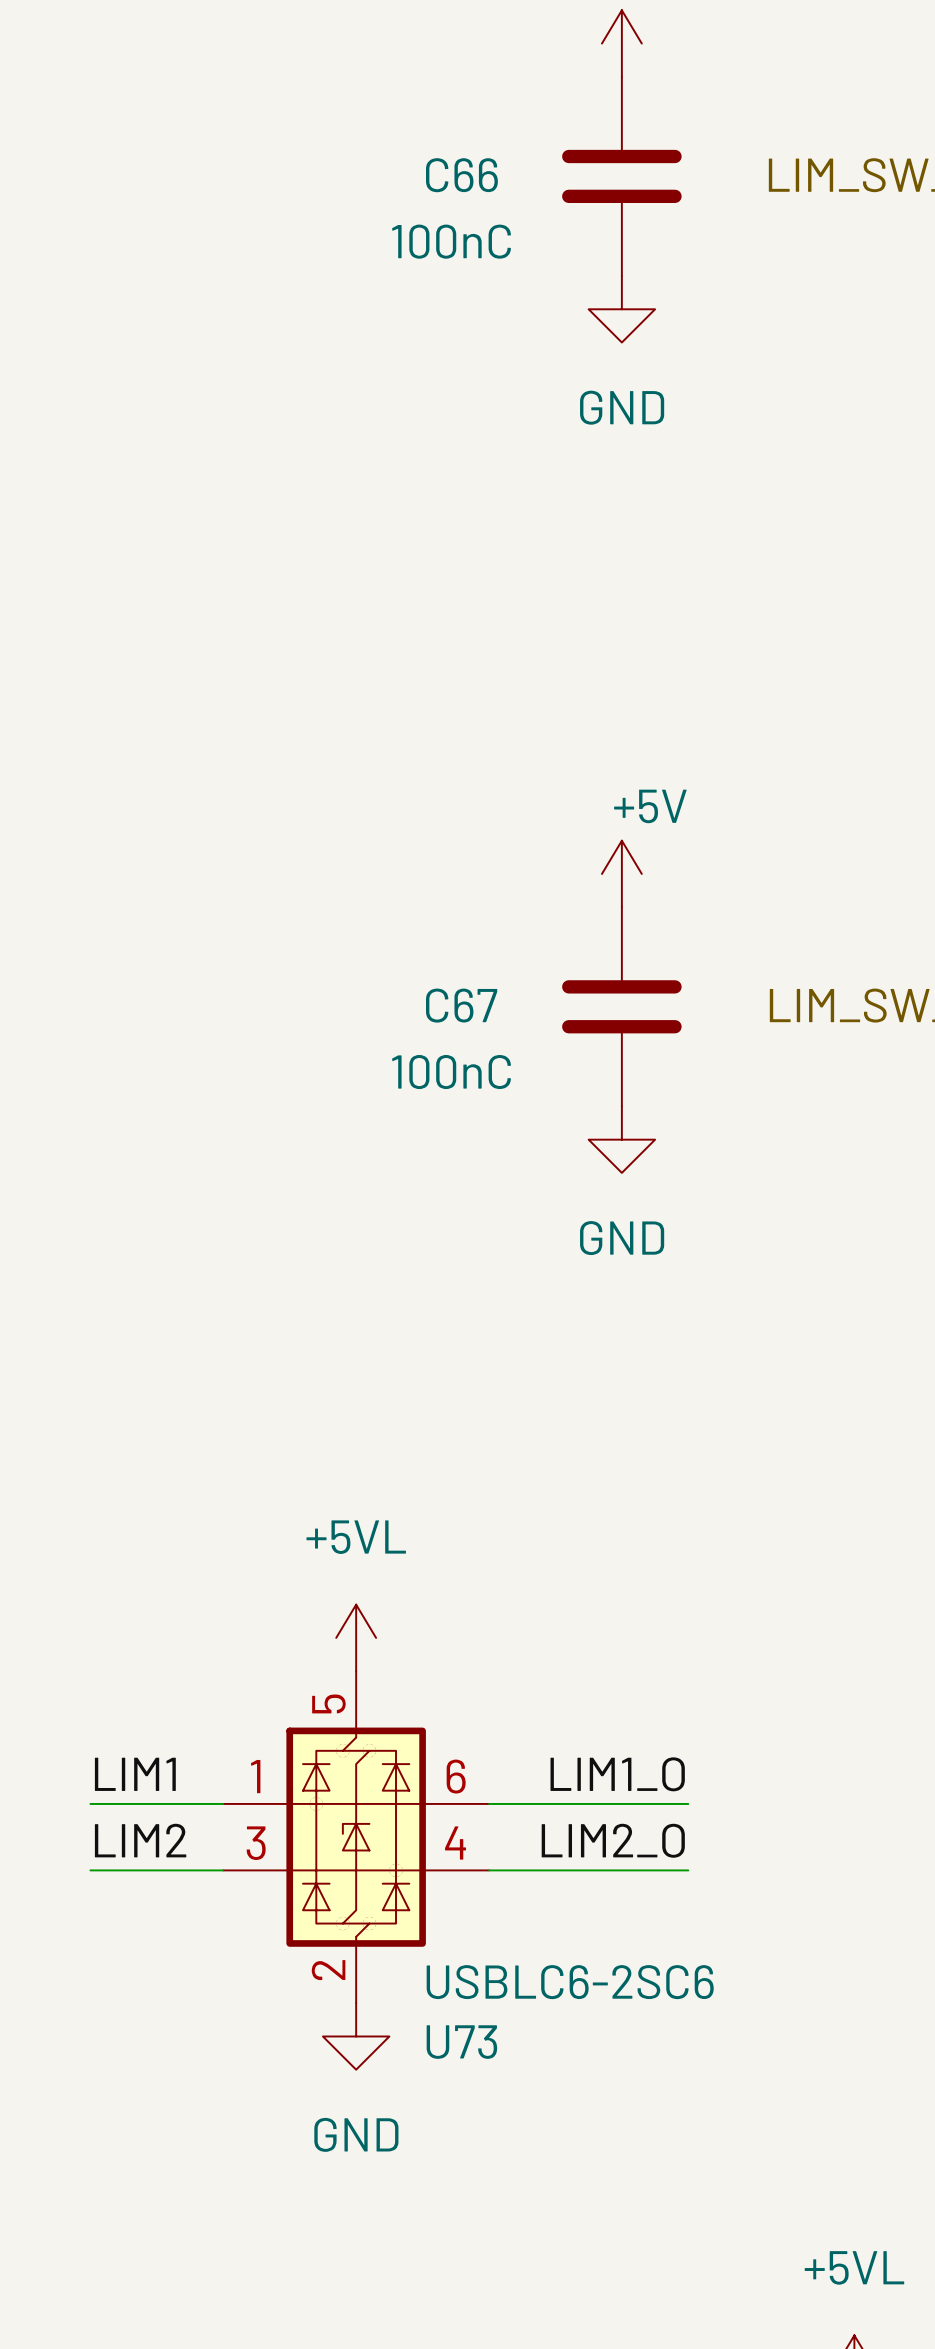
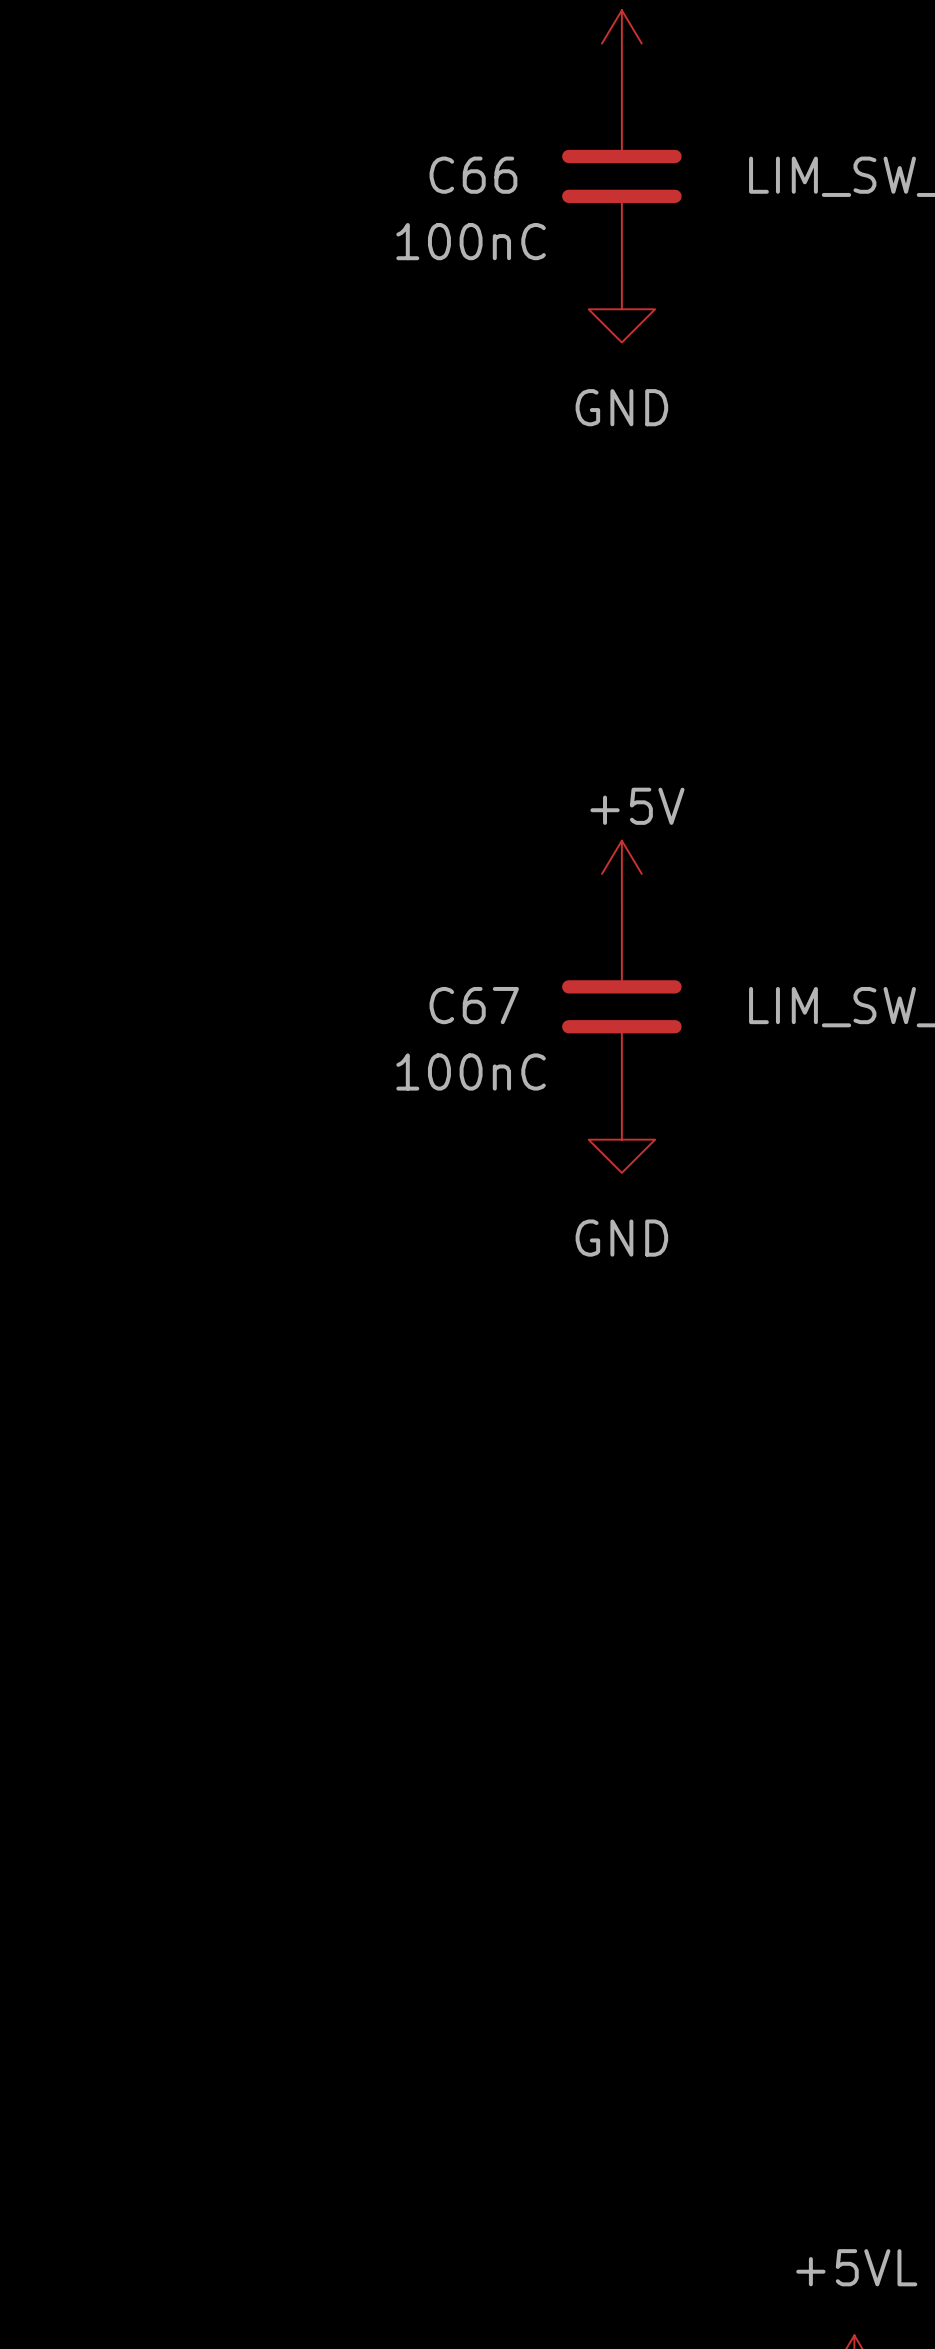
power symbol: +5VL (356, 1637) -> none
label: LIM1 (135, 1774) -> none
label: LIM1_O (617, 1774) -> none
wire: (90, 1803) (223, 1803) -> none
wire: (489, 1803) (688, 1803) -> none
U73: USBLC6-2SC6 (356, 1837) -> none
label: LIM2 (140, 1840) -> none
label: LIM2_O (613, 1840) -> none
wire: (90, 1870) (223, 1870) -> none
wire: (489, 1870) (688, 1870) -> none
power symbol: GND (356, 2036) -> none

